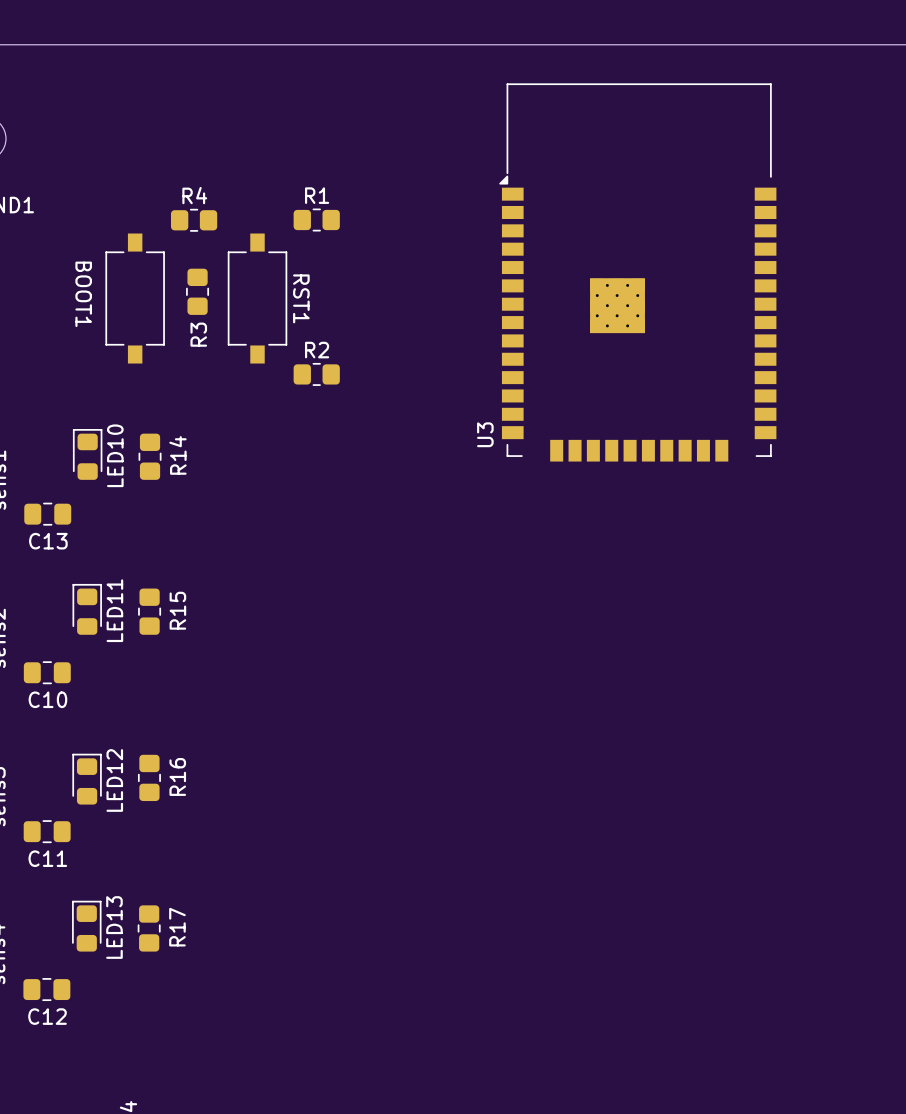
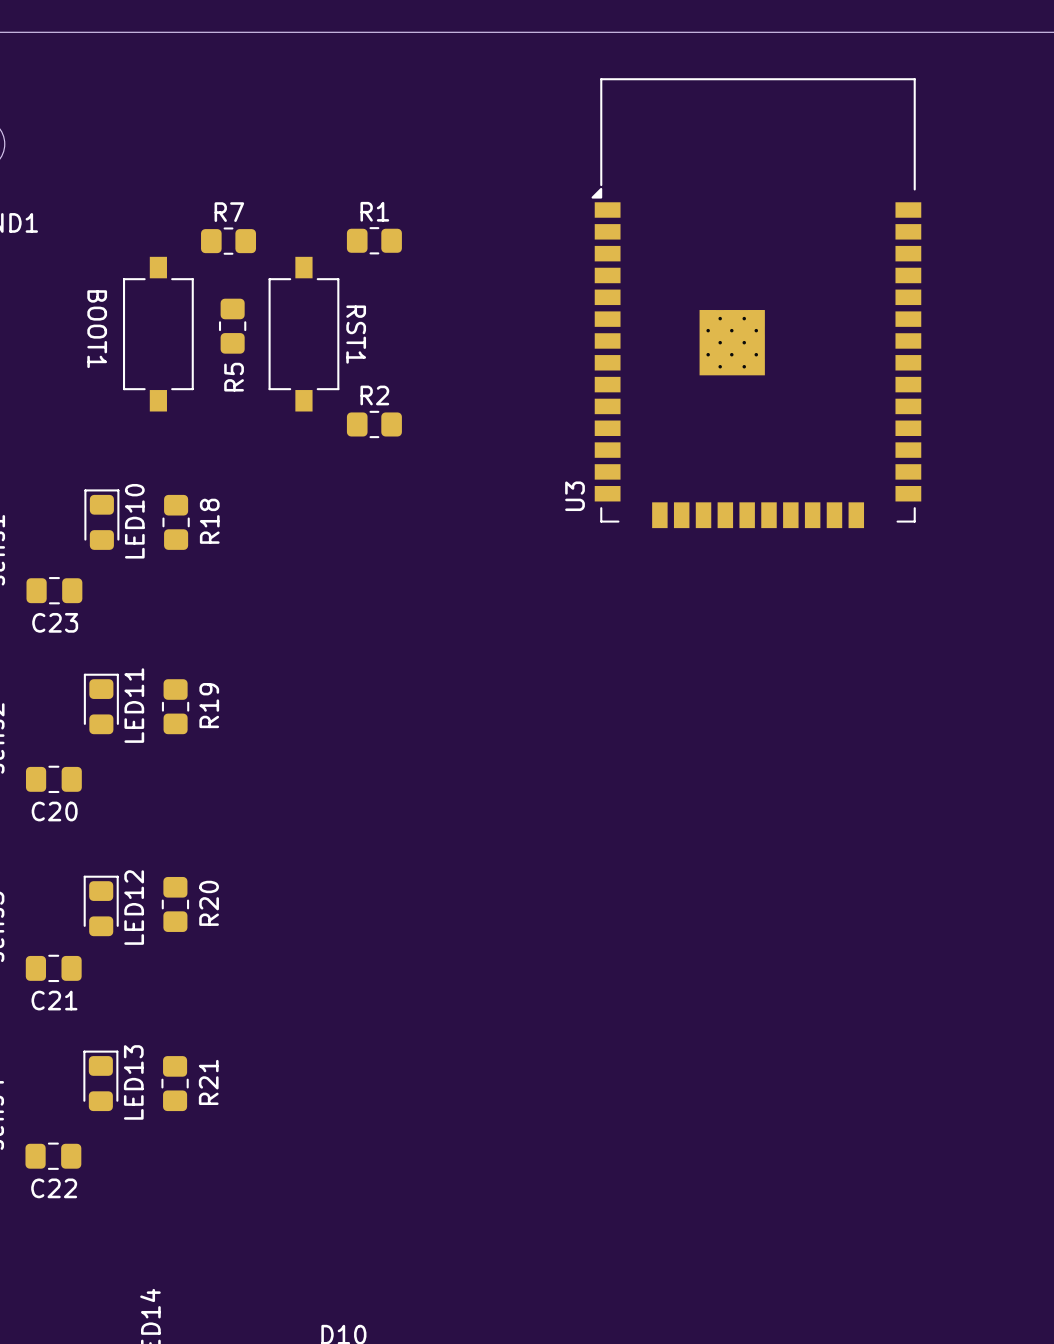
R4 name: R4 (194, 195) -> R7 (229, 212)
R3 name: R3 (198, 334) -> R5 (234, 377)
R14 name: R14 (177, 455) -> R18 (209, 521)
C13 name: C13 (48, 541) -> C23 (55, 622)
R15 name: R15 (177, 610) -> R19 (209, 705)
C10 name: C10 (47, 699) -> C20 (54, 811)
R16 name: R16 (177, 776) -> R20 (209, 903)
C11 name: C11 (47, 858) -> C21 (54, 1000)
R17 name: R17 (177, 927) -> R21 (208, 1082)
C12 name: C12 (47, 1016) -> C22 (54, 1188)

